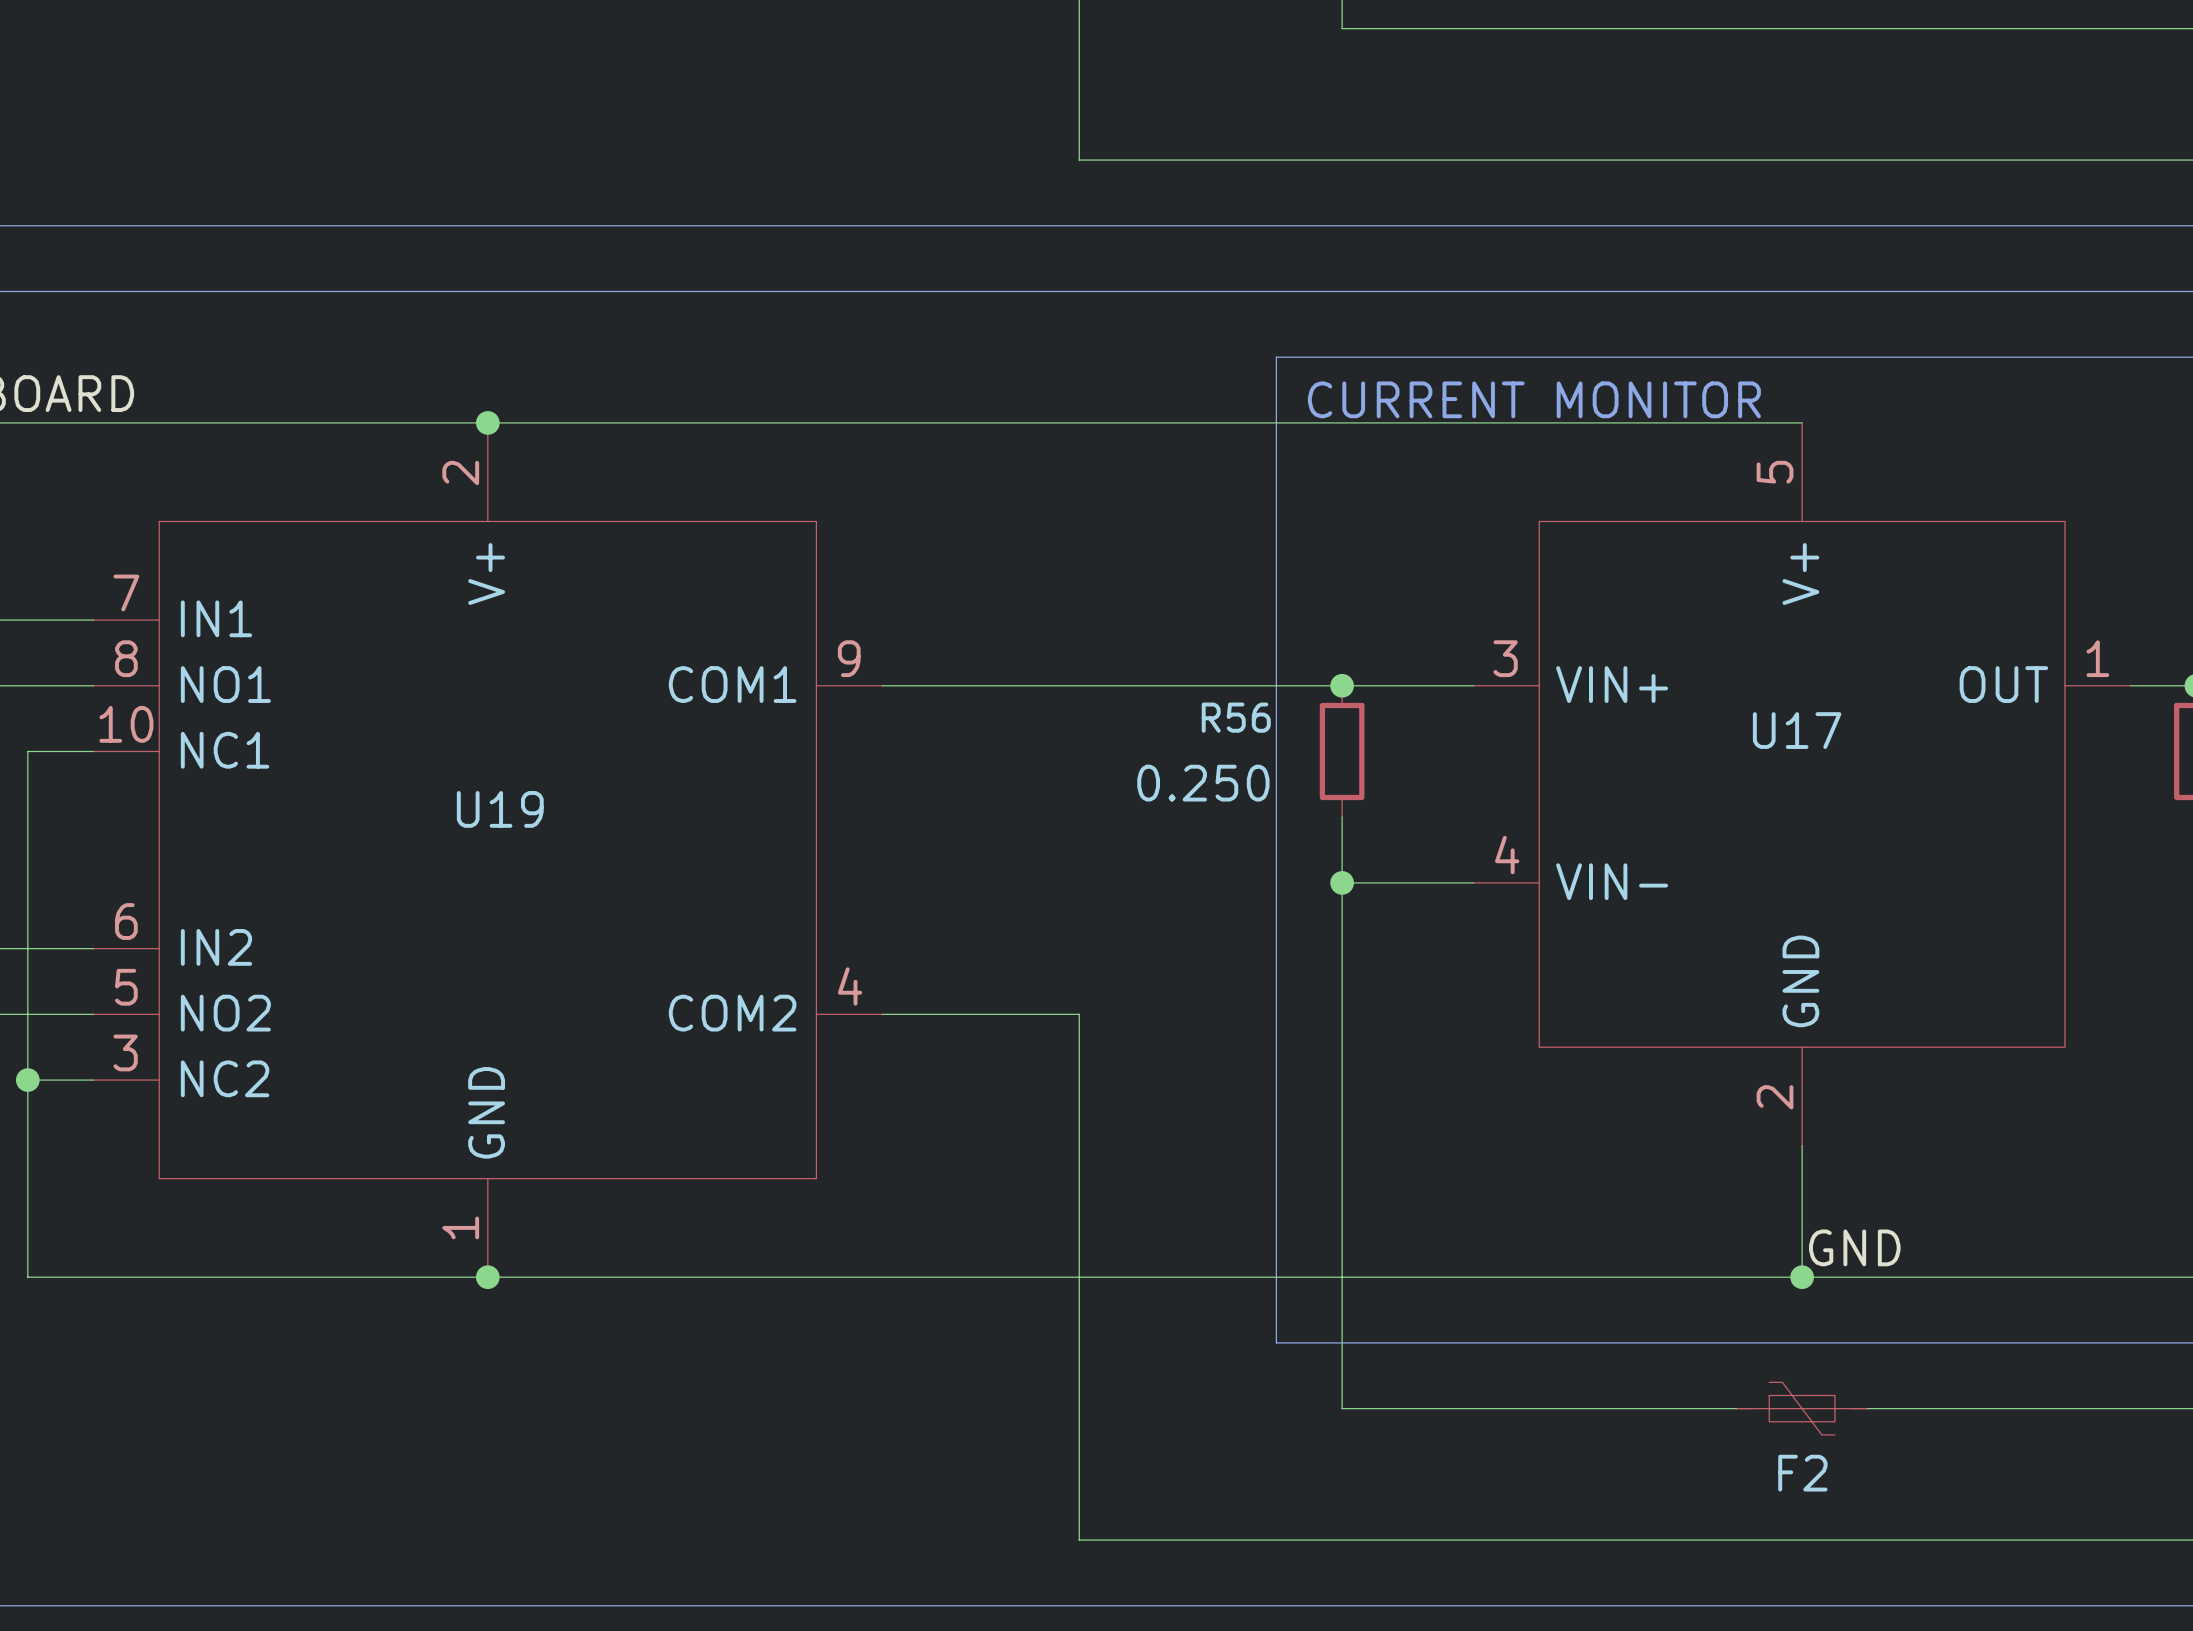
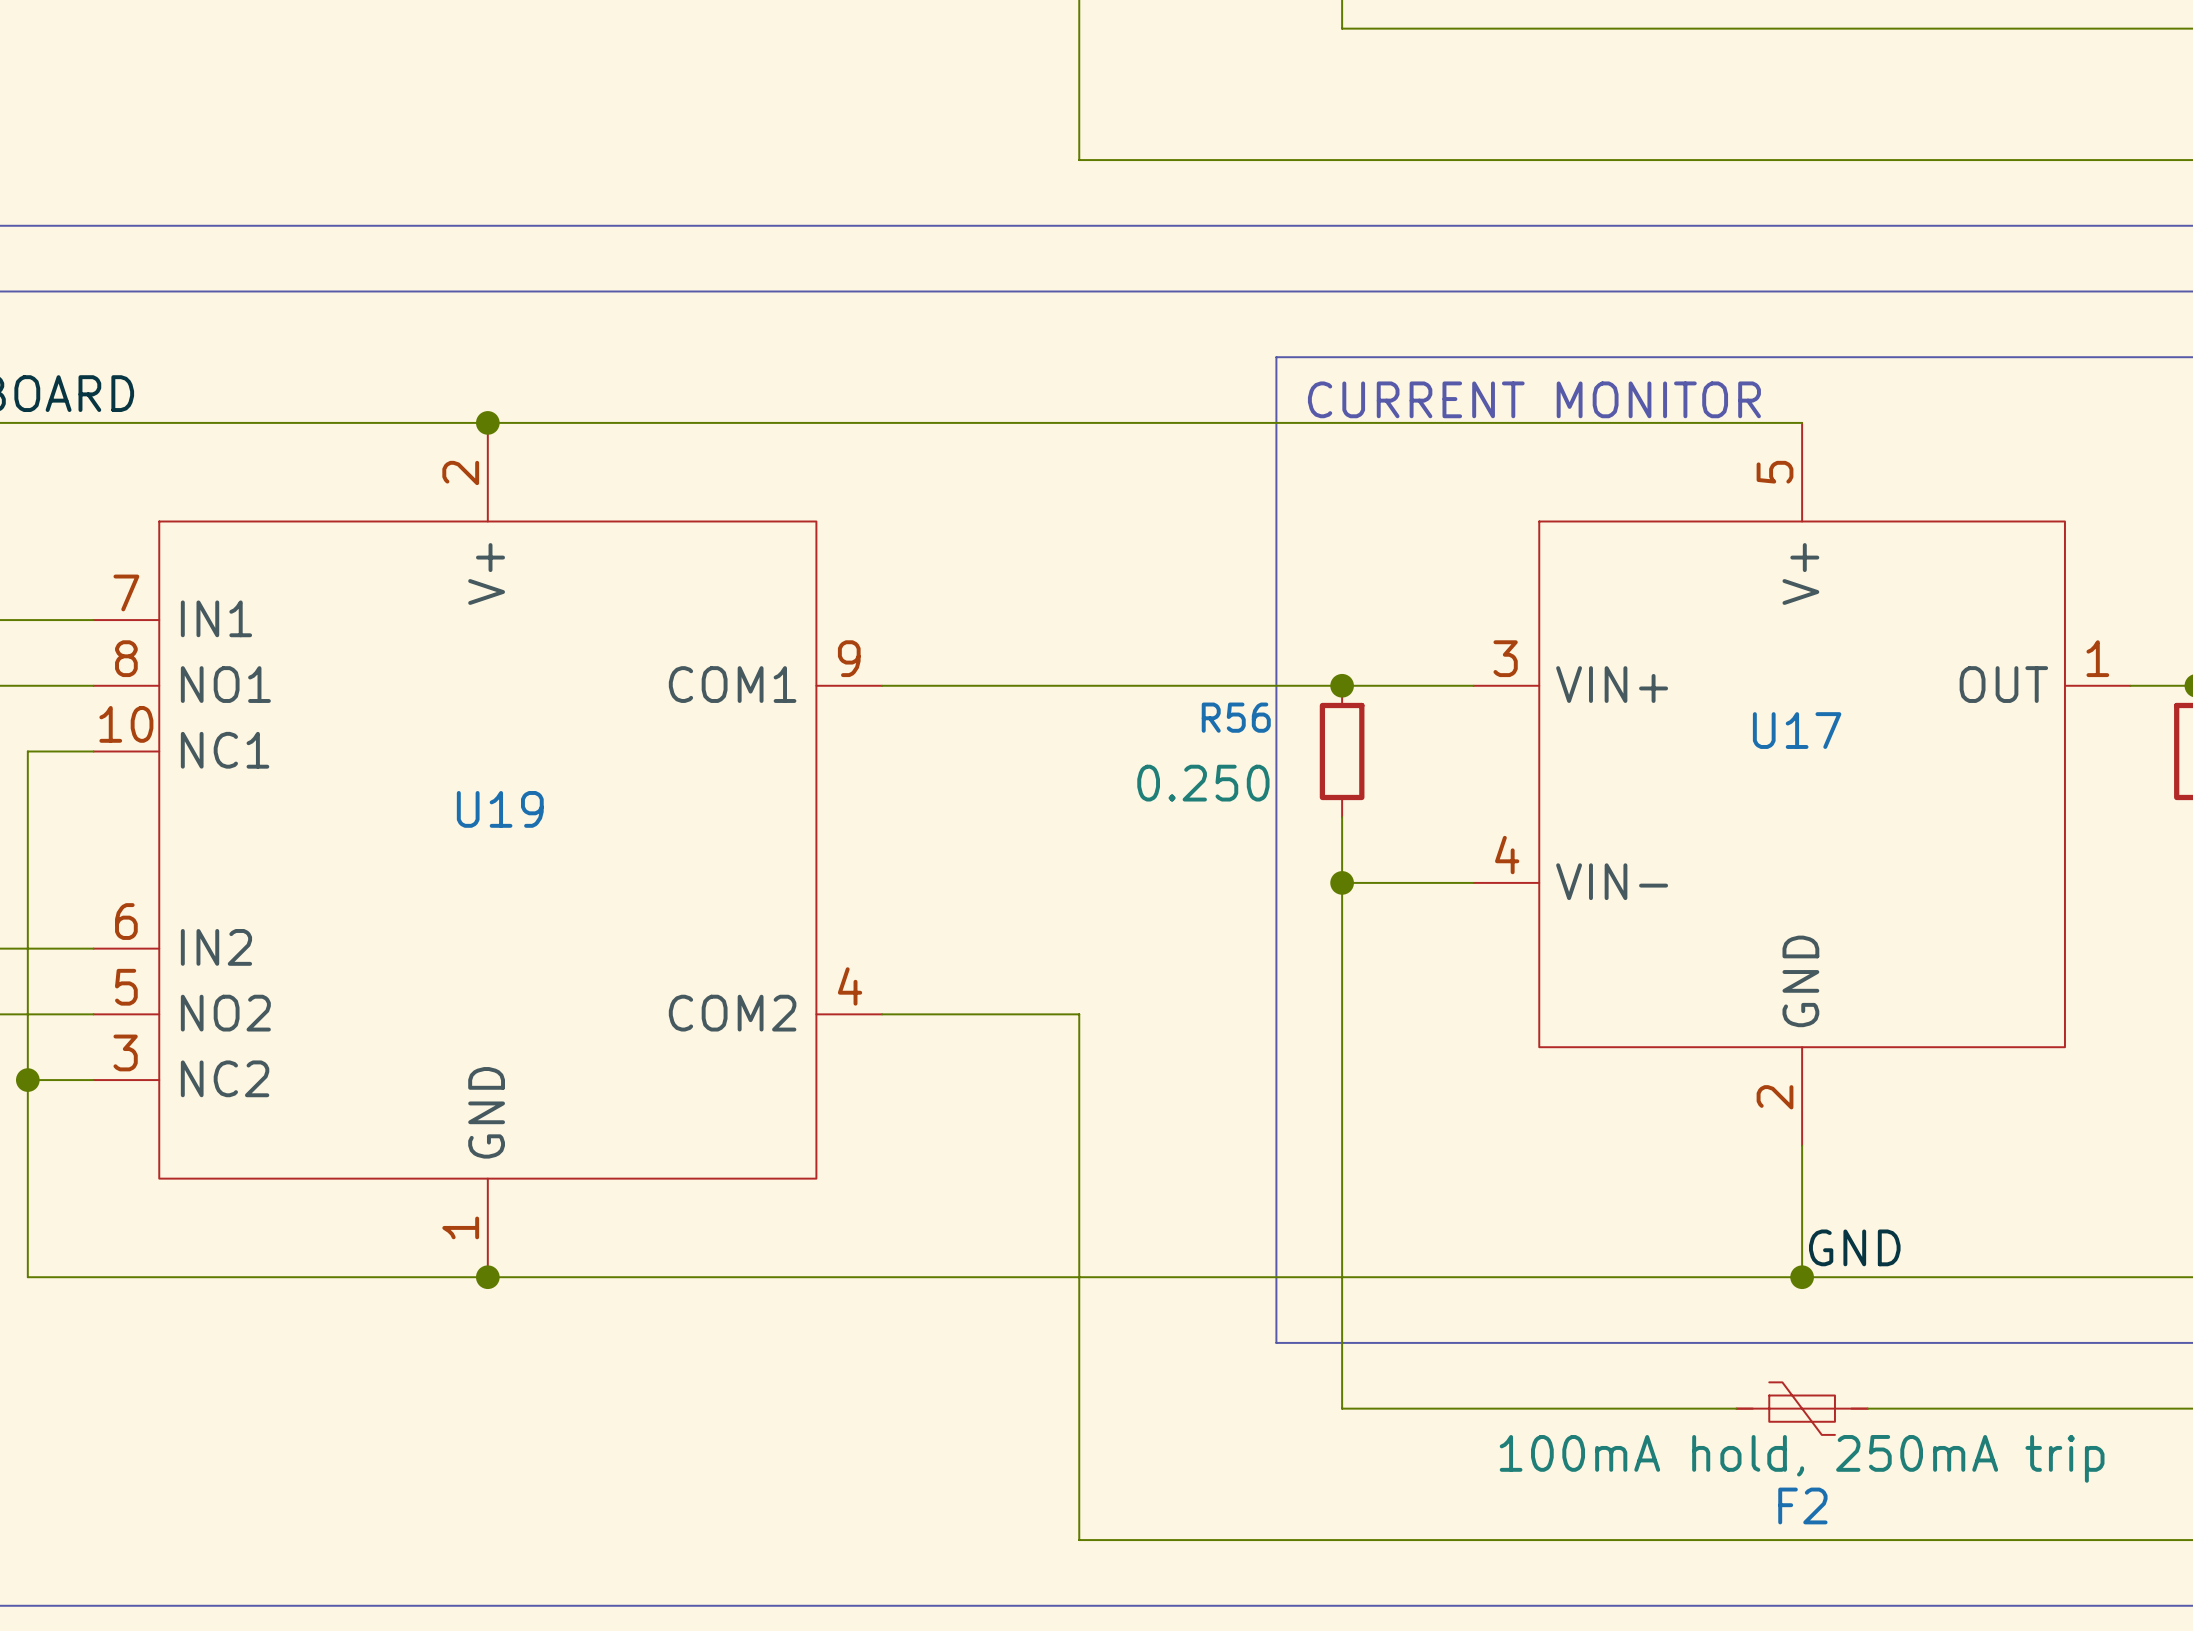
F2 value: none -> 100mA hold, 250mA trip (1802, 1458)
F2 name position: F2 (1802, 1473) -> F2 (1802, 1505)

